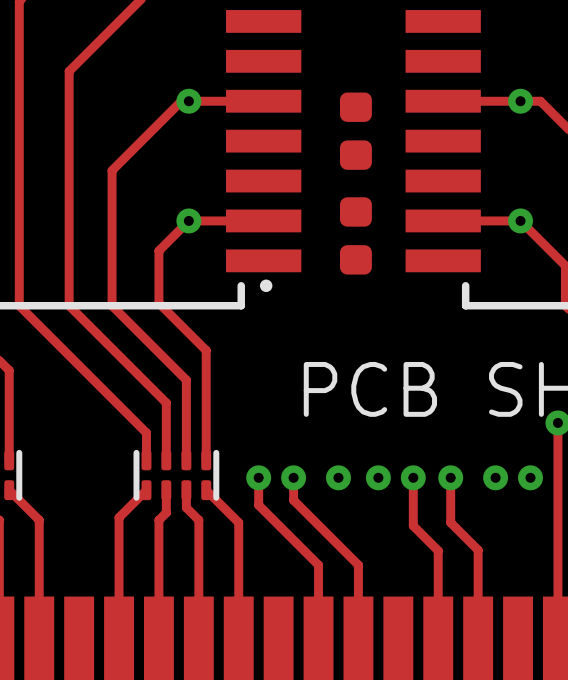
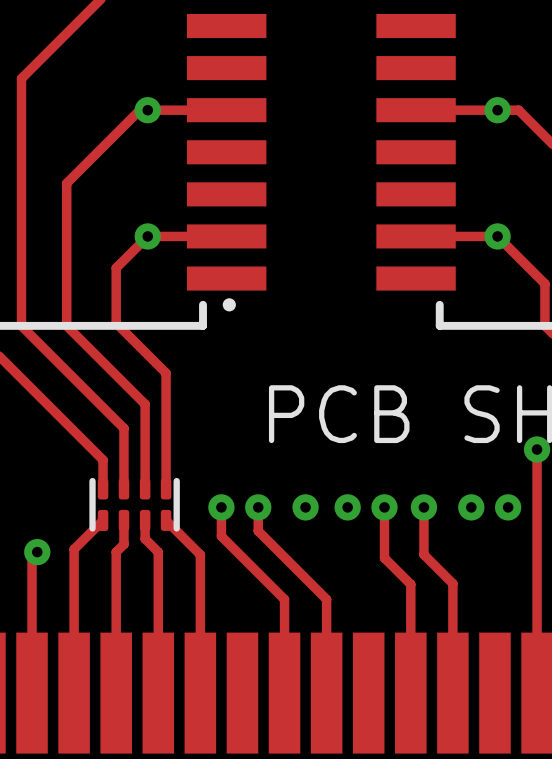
part: (355, 131) -> none
part: (355, 235) -> none
track: none -> (37, 552) (32, 557) (32, 693)
via: none -> (37, 552)

